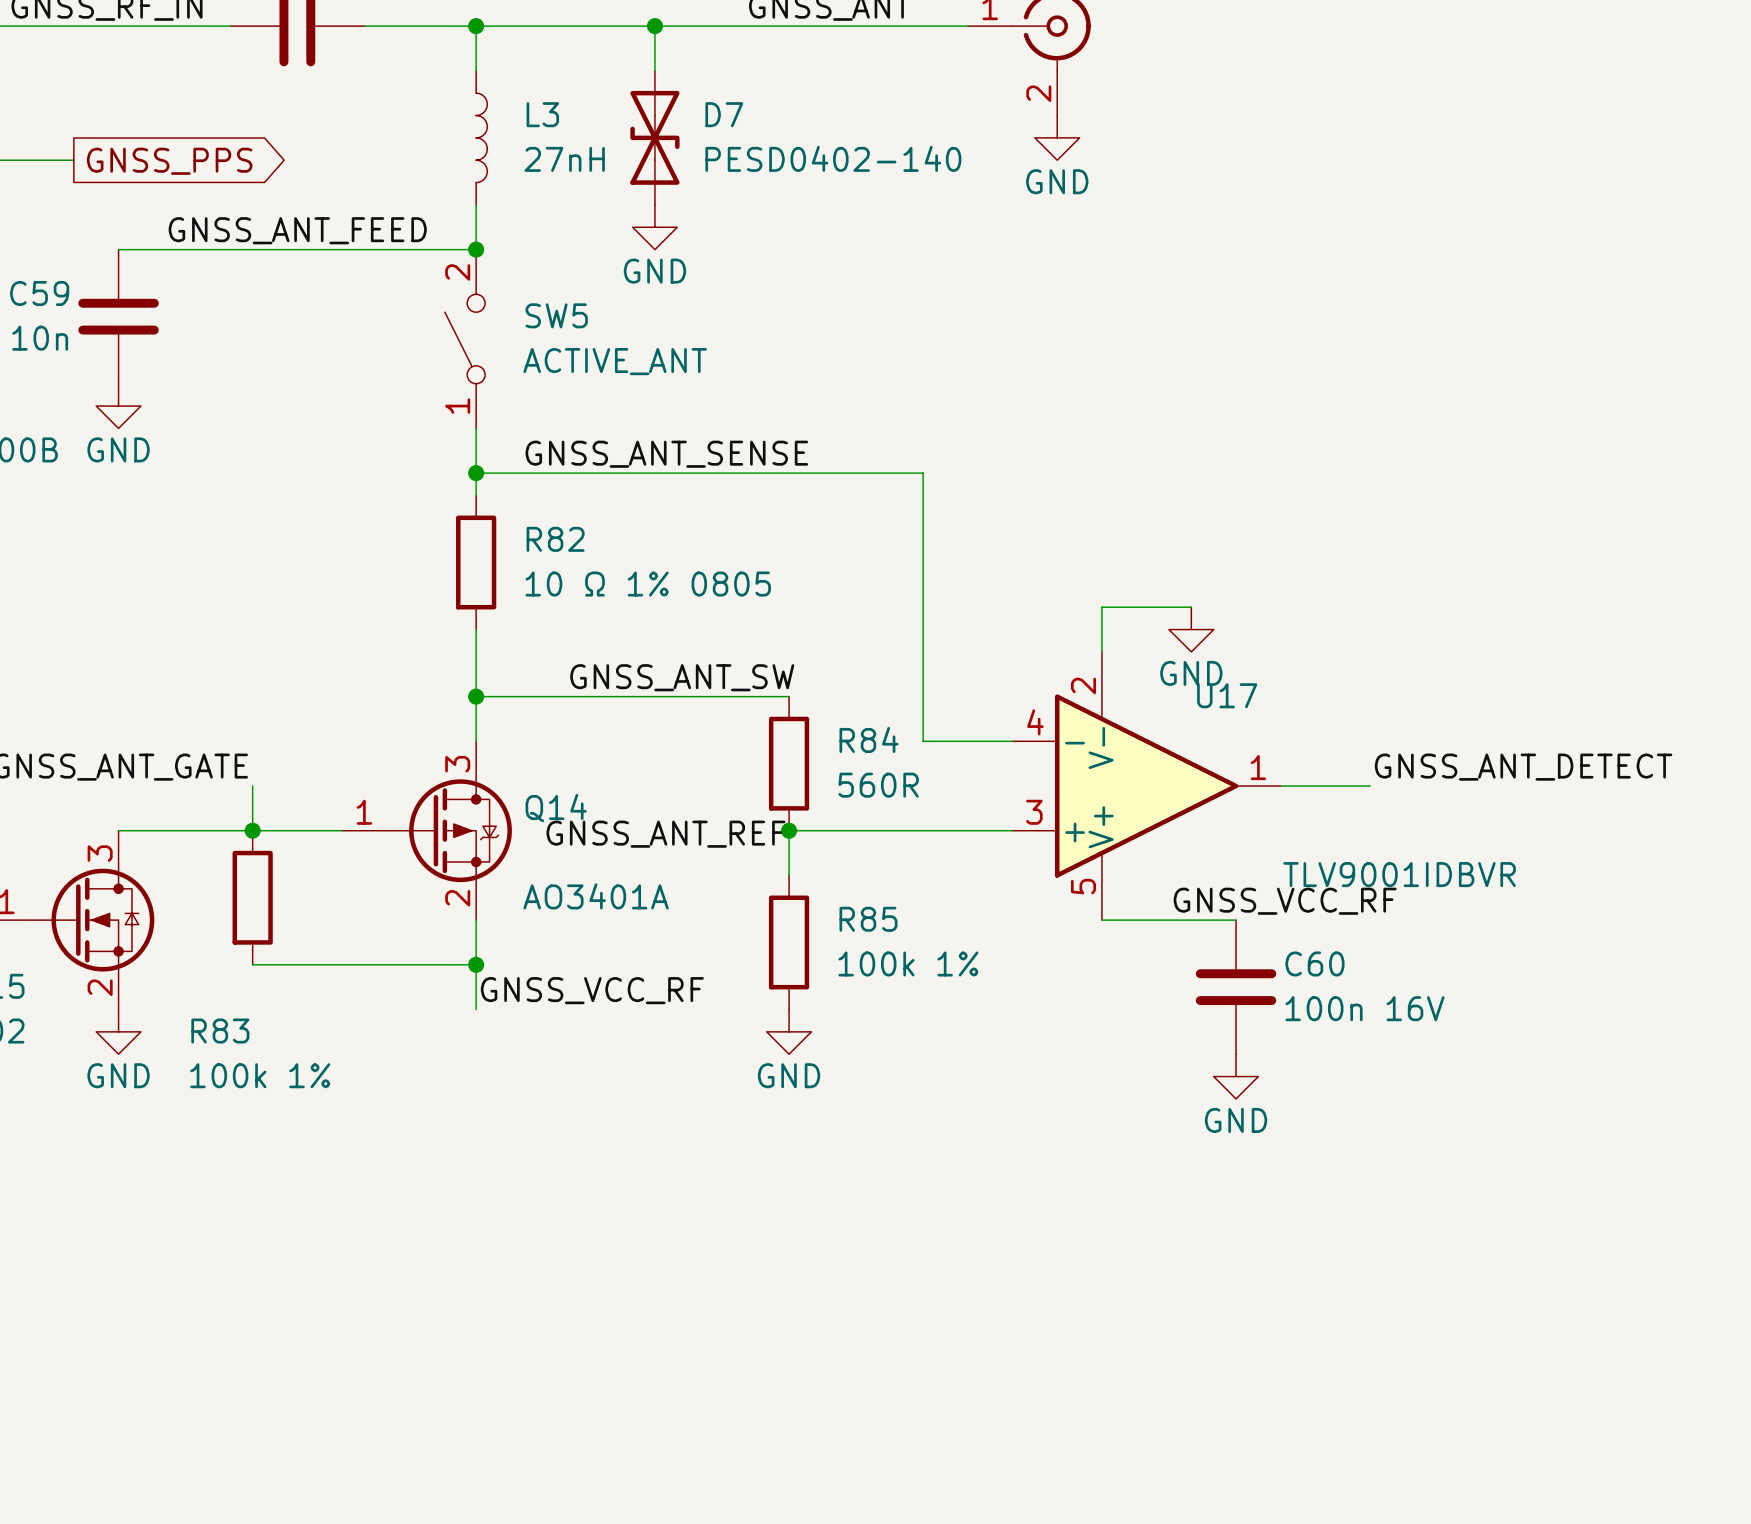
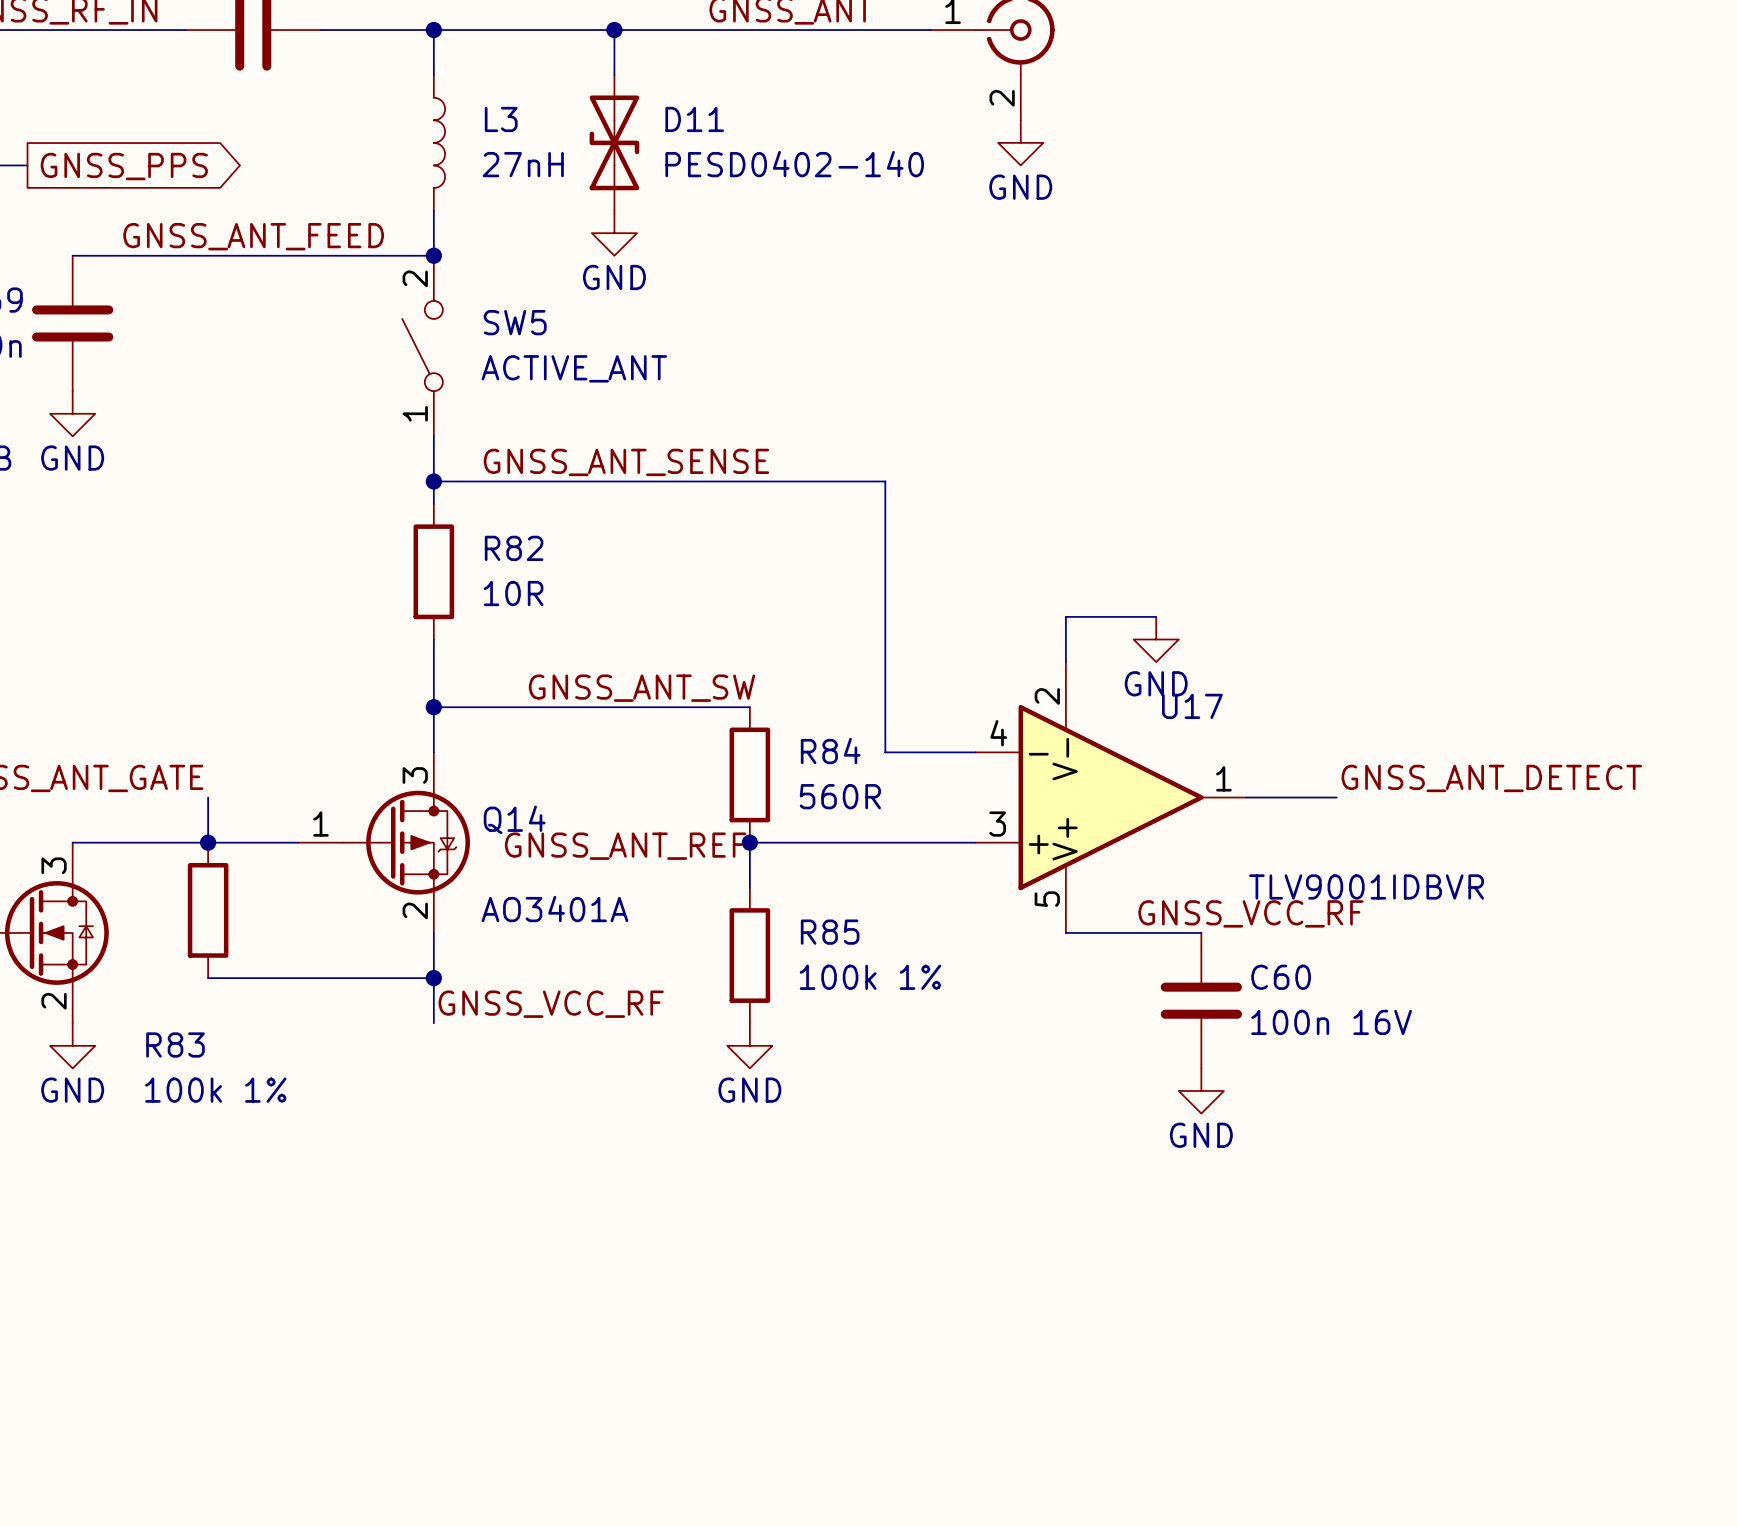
D7 name: D7 (724, 114) -> D11 (694, 119)
R82 value: 10 Ω 1% 0805 (648, 584) -> 10R (513, 593)

